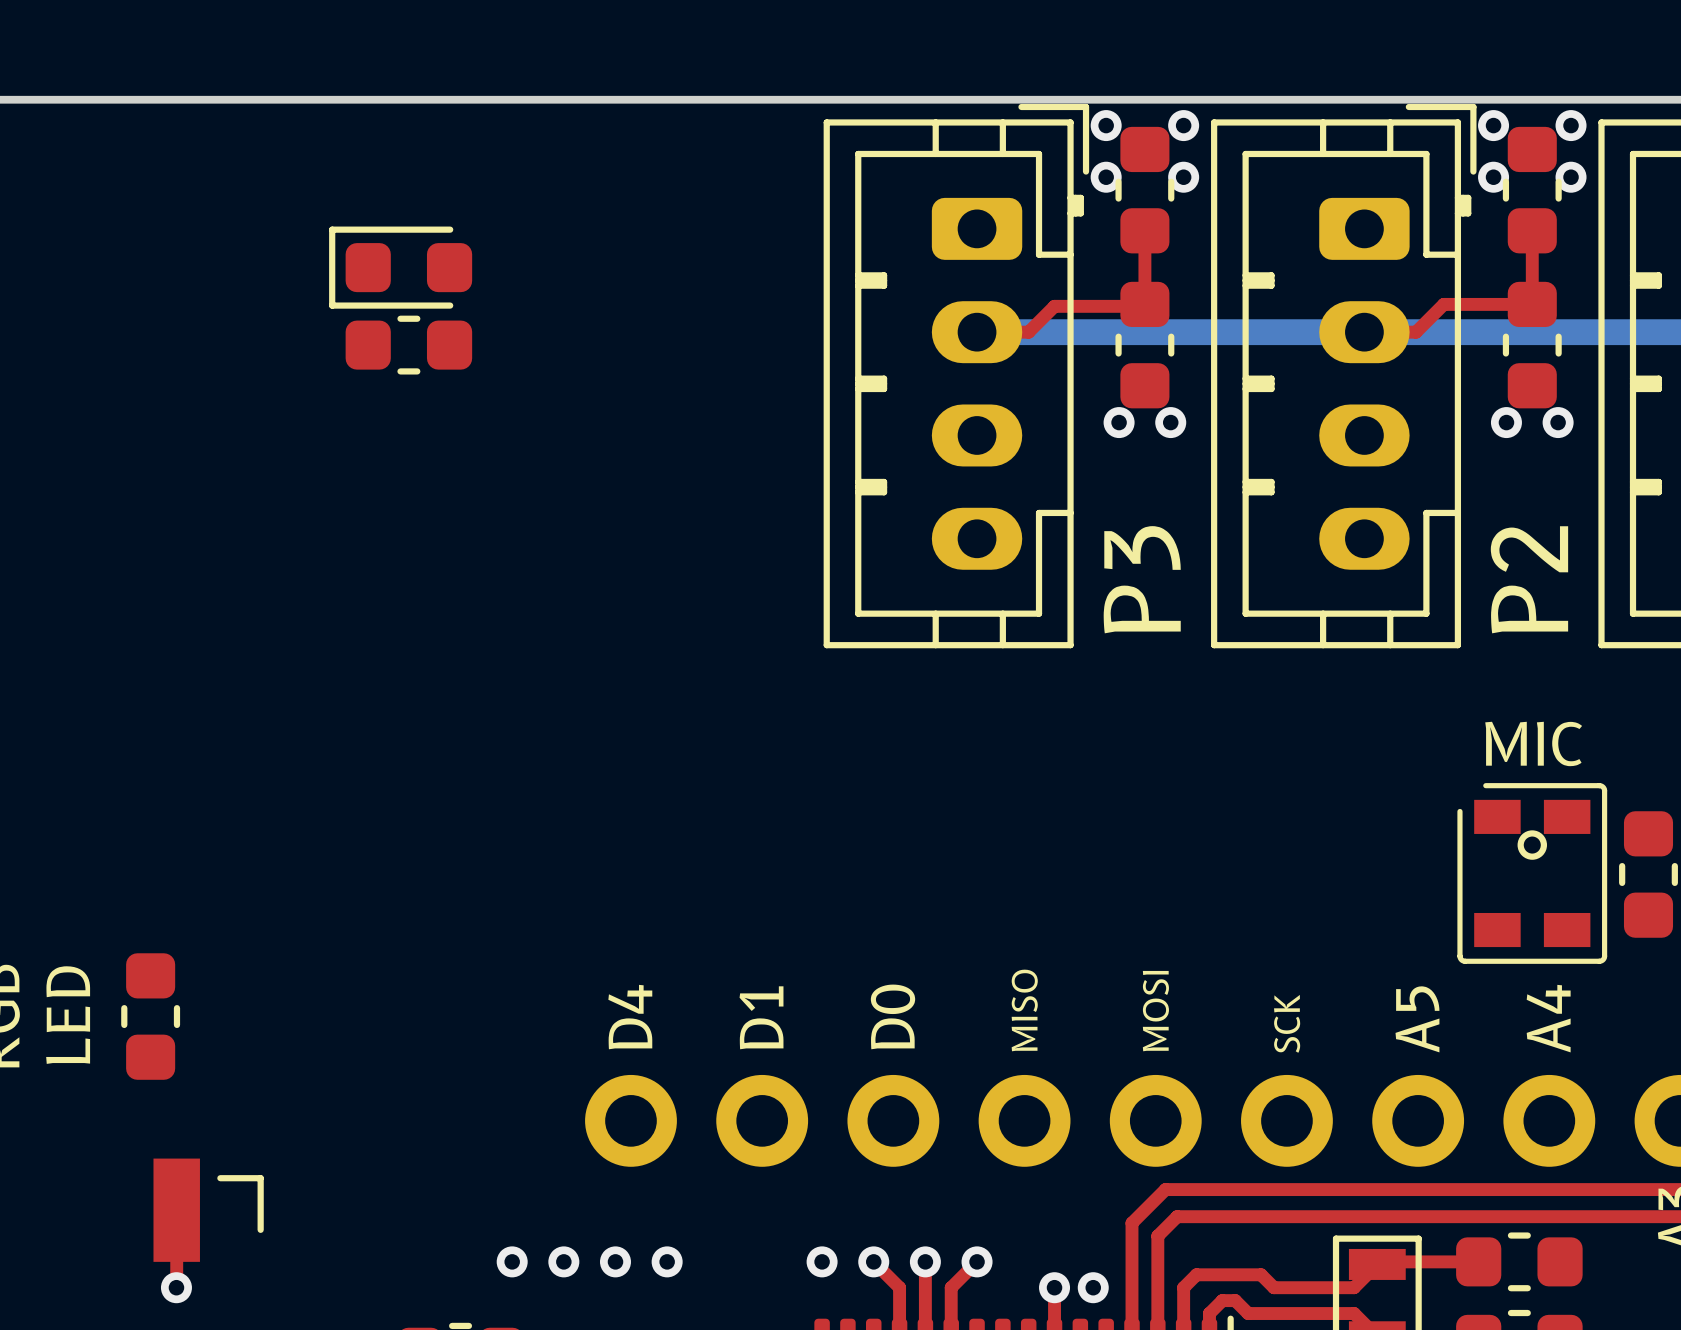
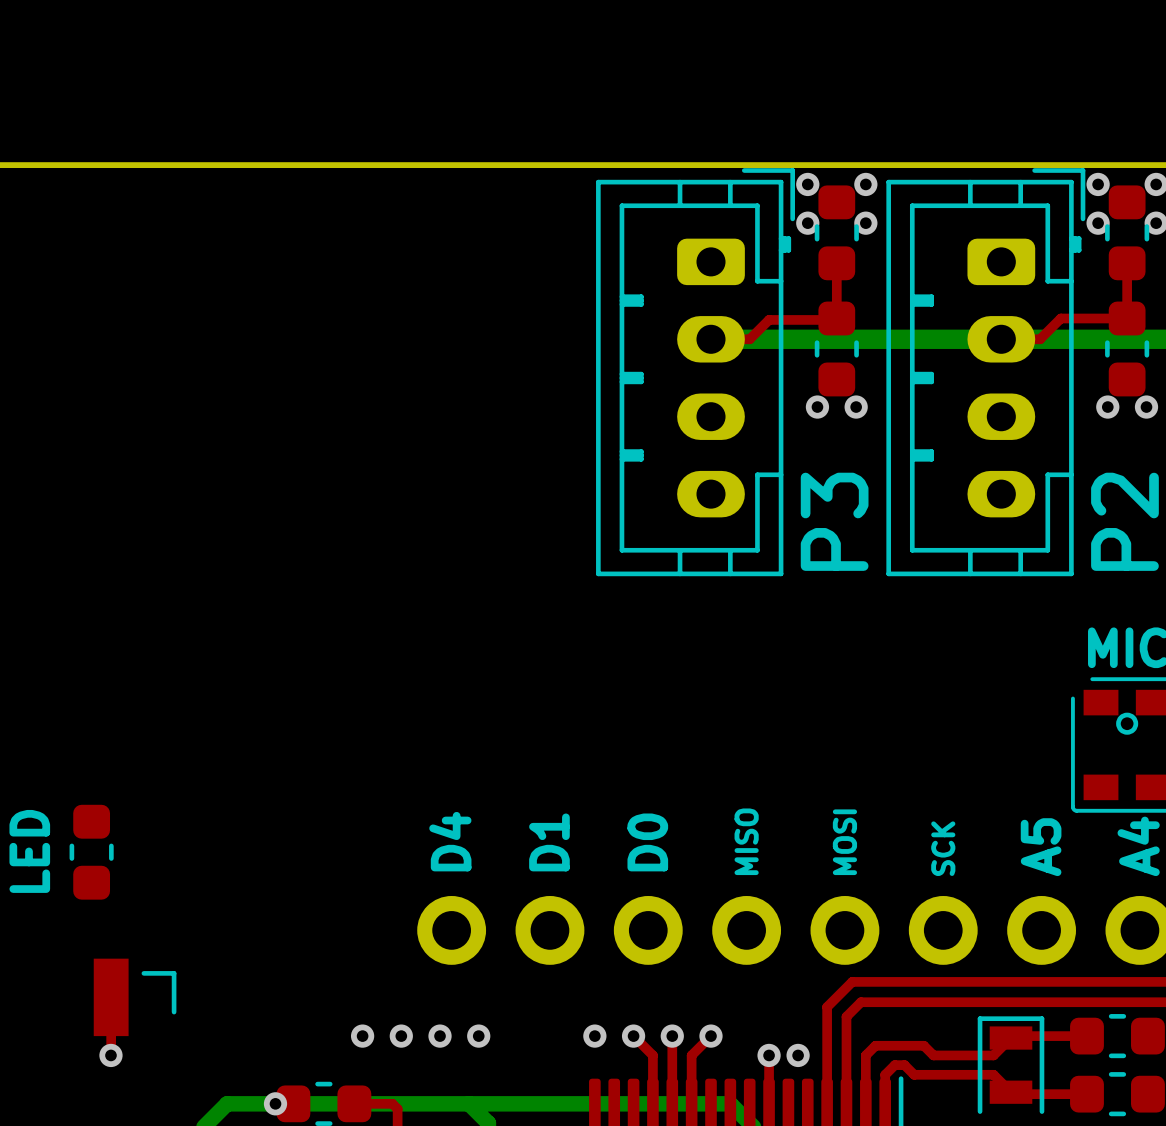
part: (400, 267) -> none
part: (408, 345) -> none

